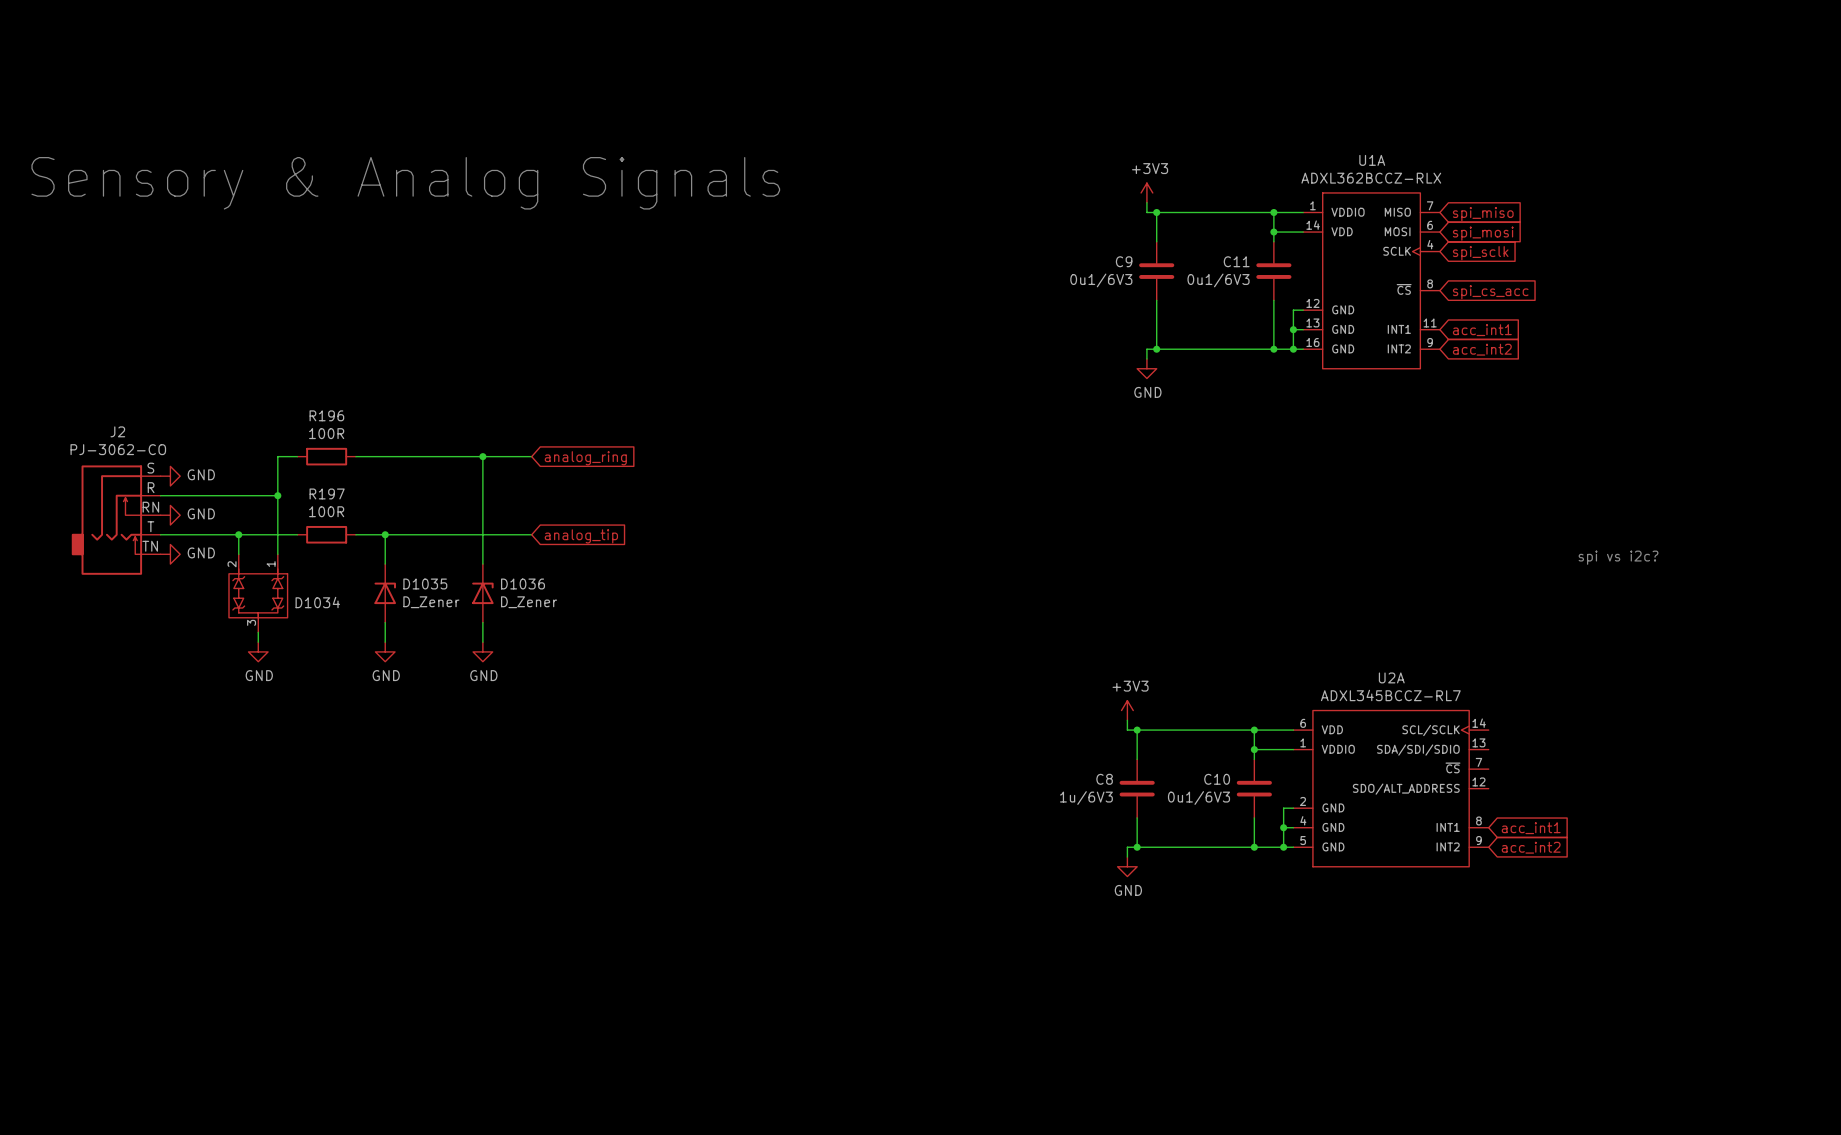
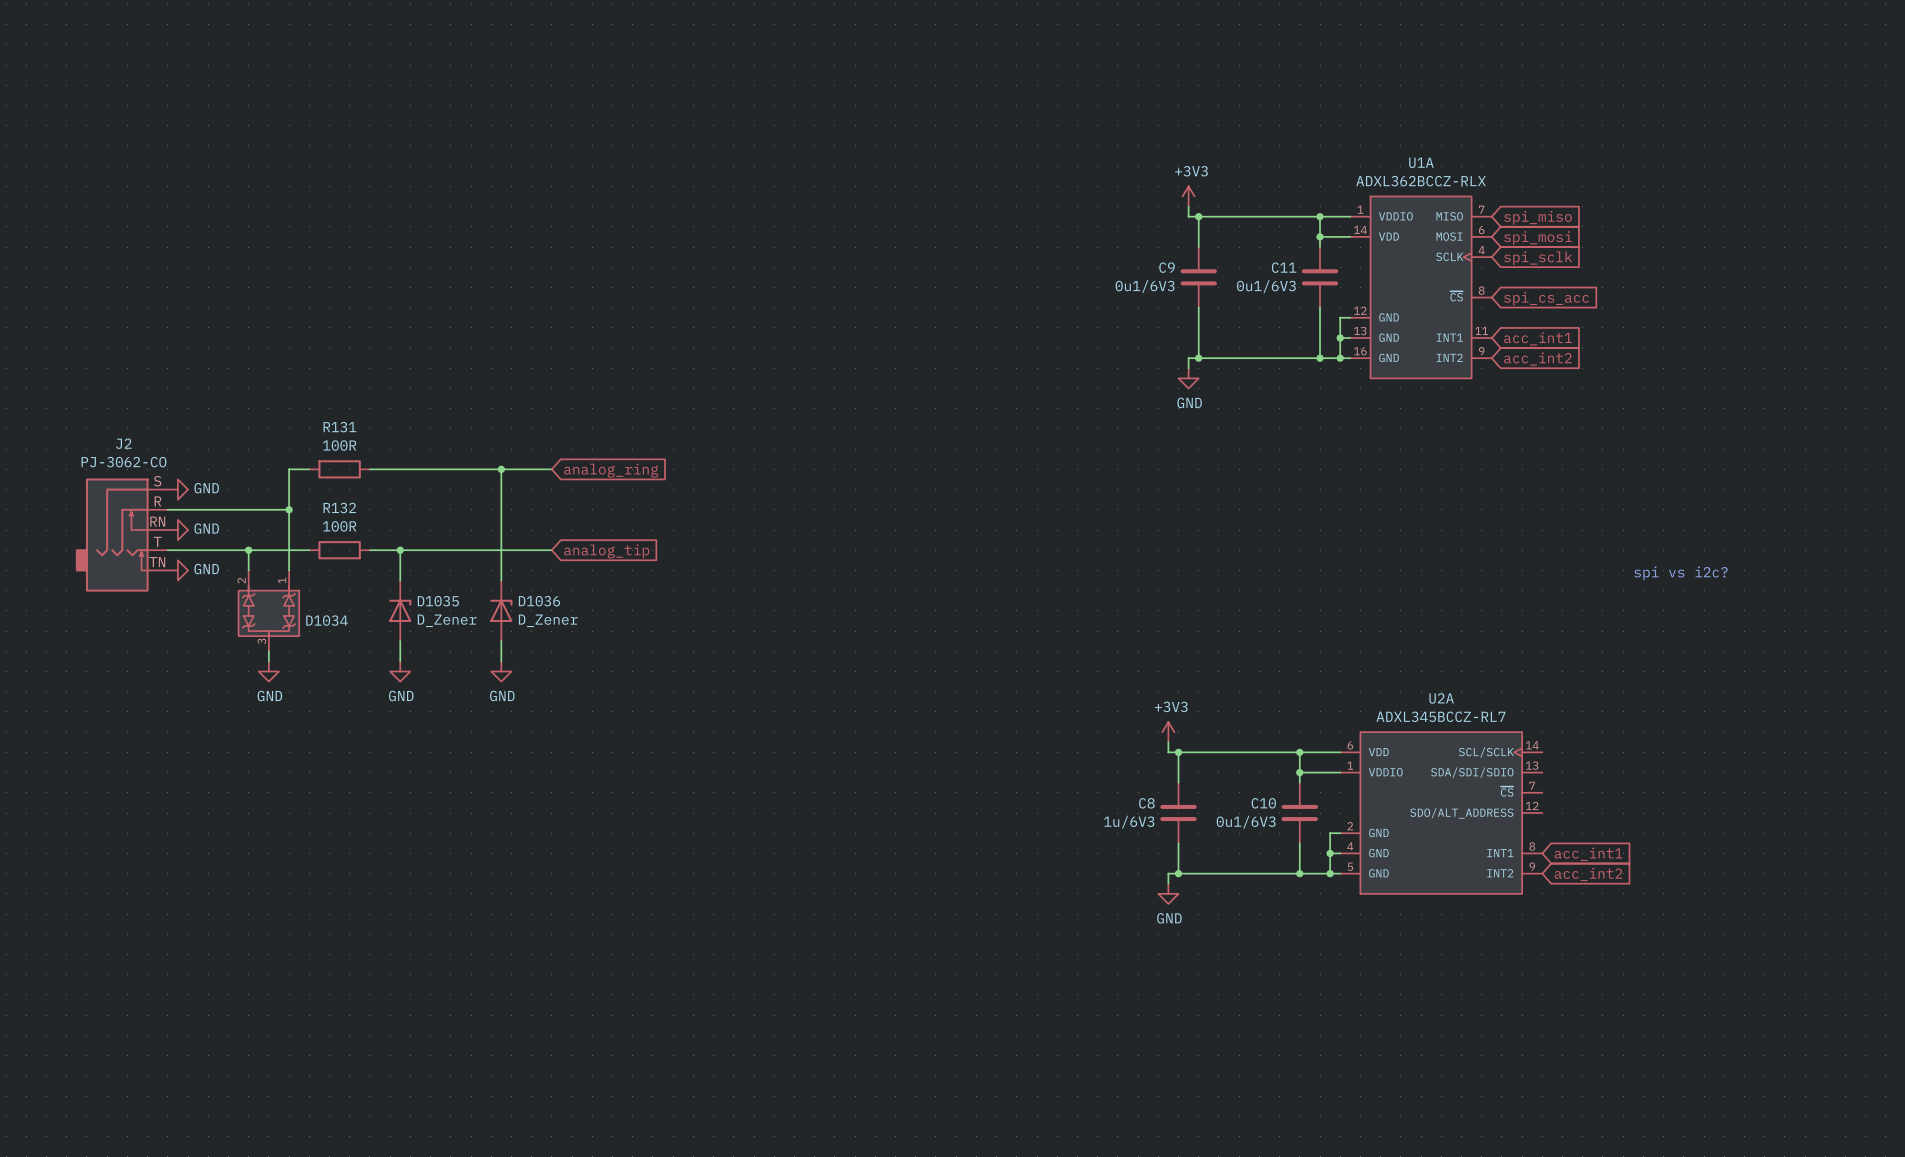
text: Sensory & Analog Signals (405, 183) -> none
R196 name: R196 (326, 415) -> R131 (339, 427)
R197 name: R197 (327, 493) -> R132 (339, 508)

